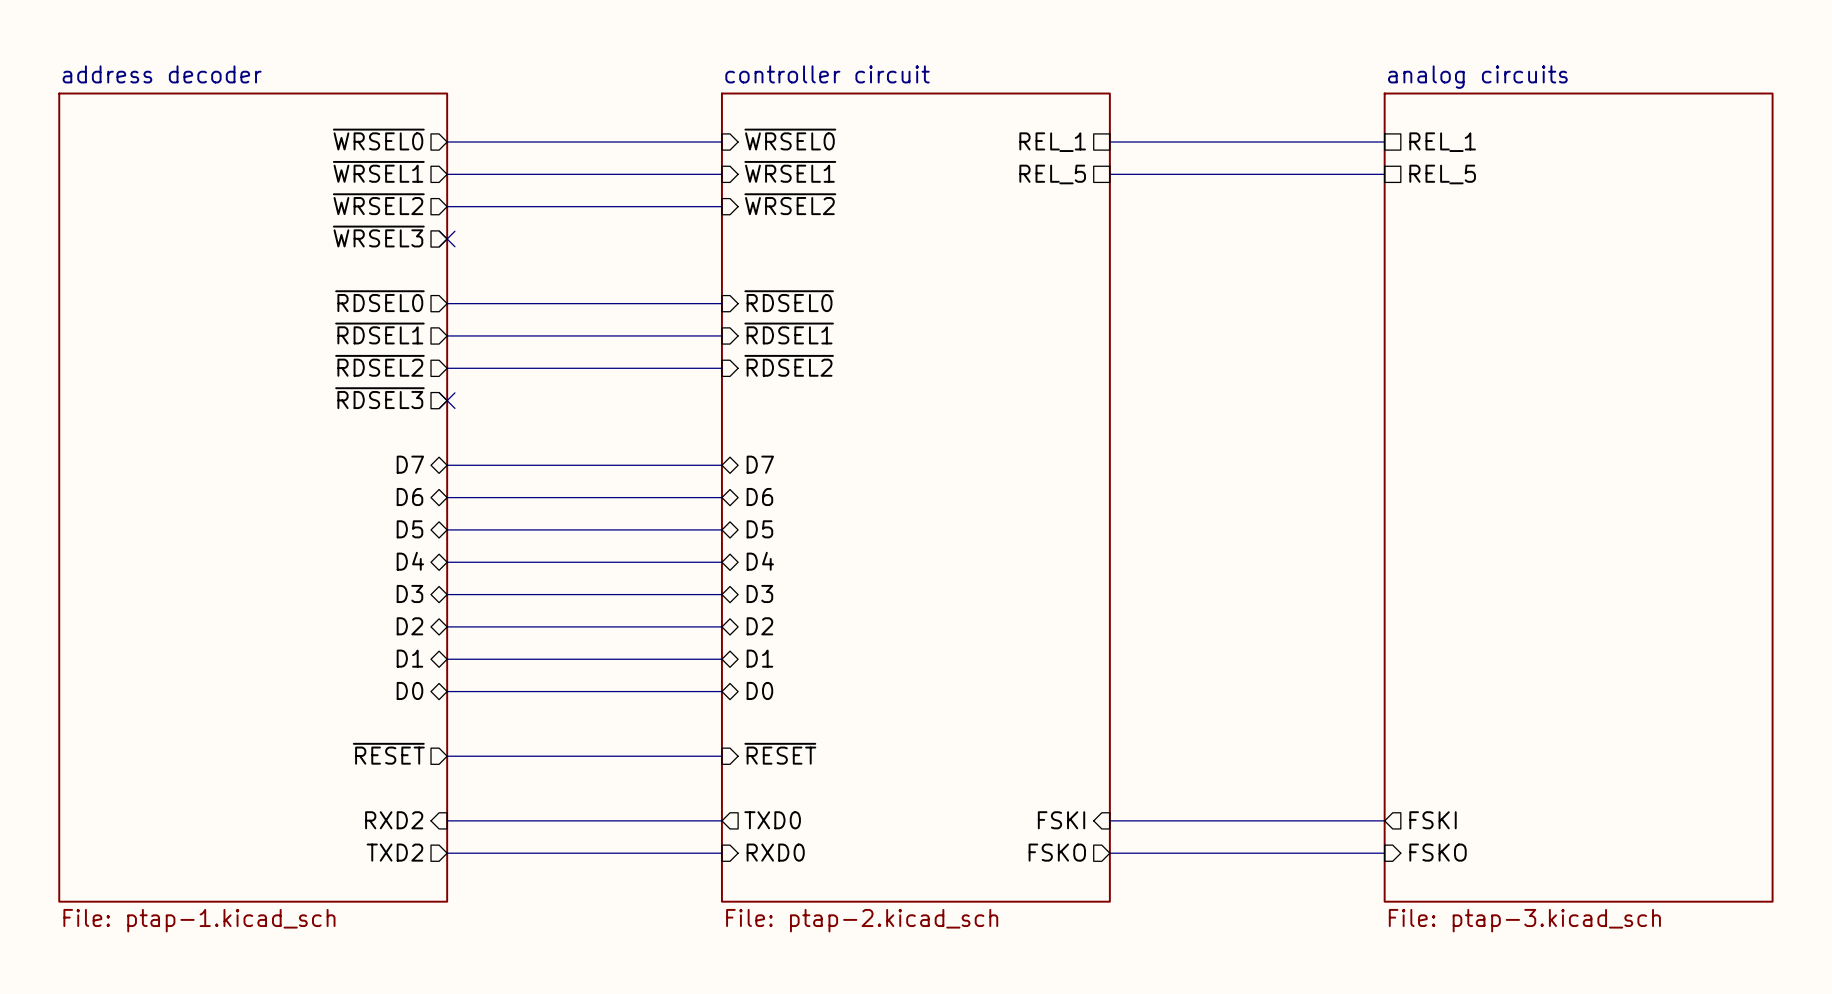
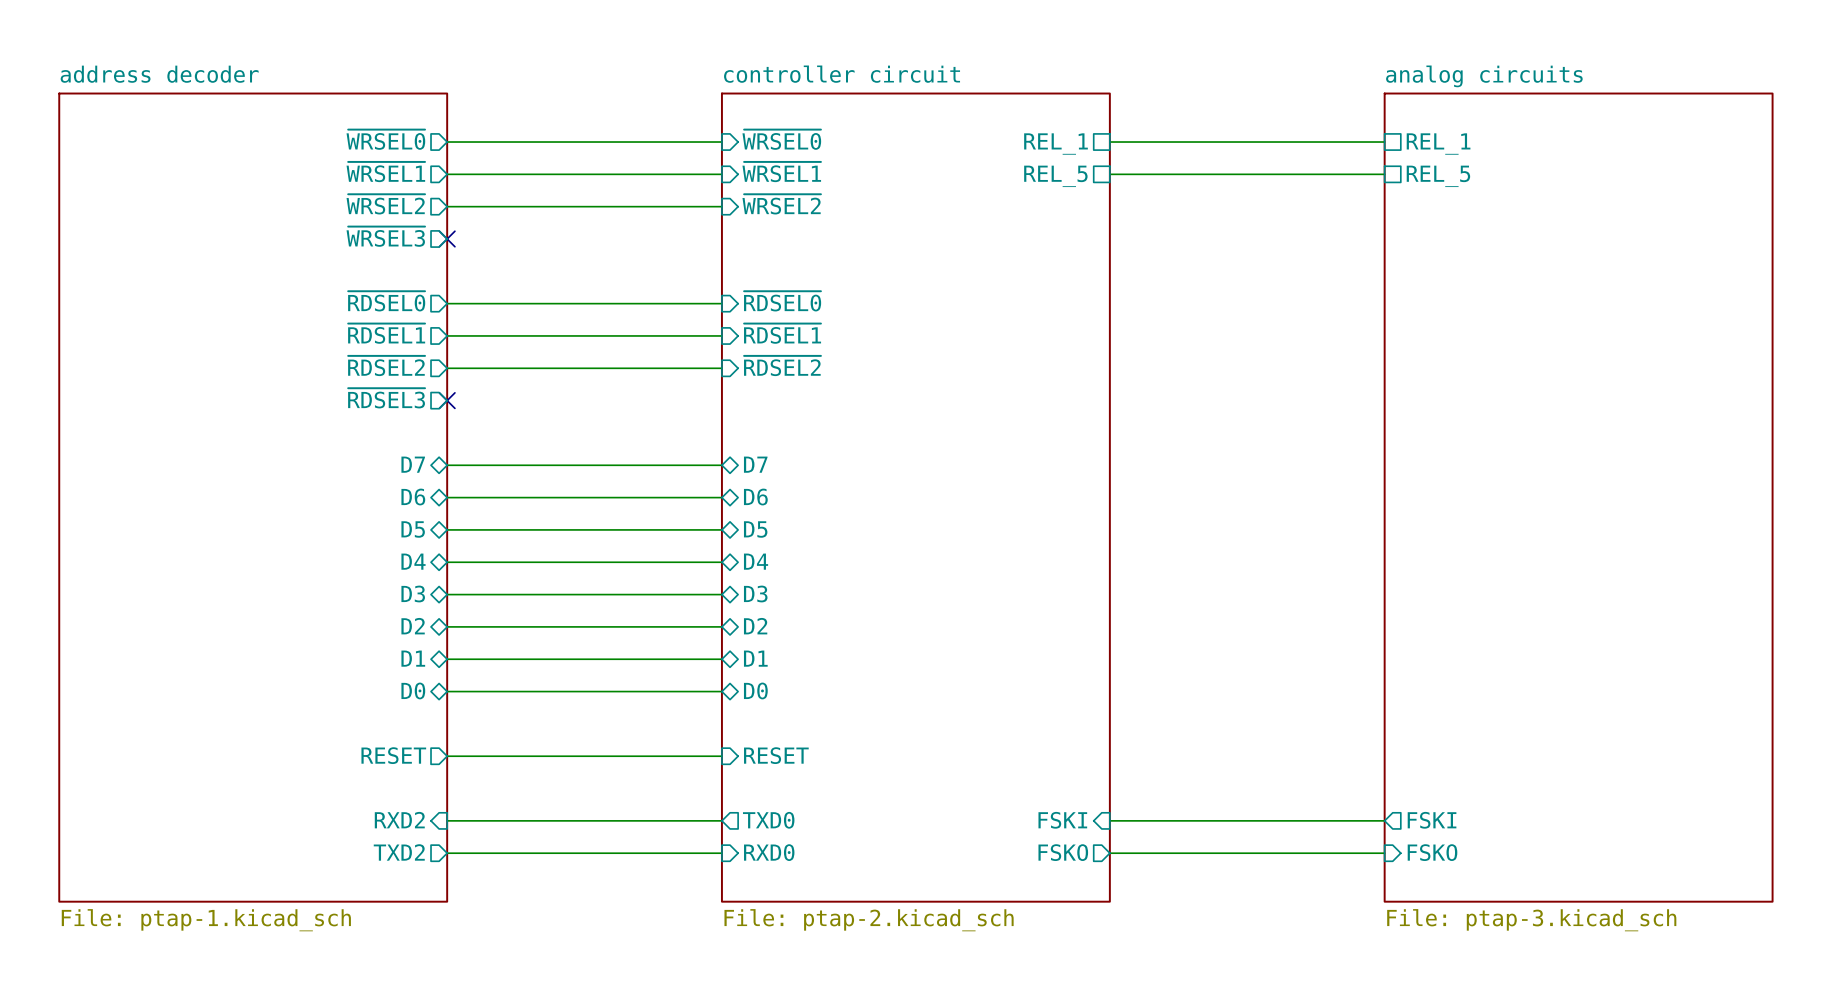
sheet pin: ~{RESET} (388, 753) -> RESET (393, 755)
sheet pin: ~{RESET} (780, 753) -> RESET (776, 755)

